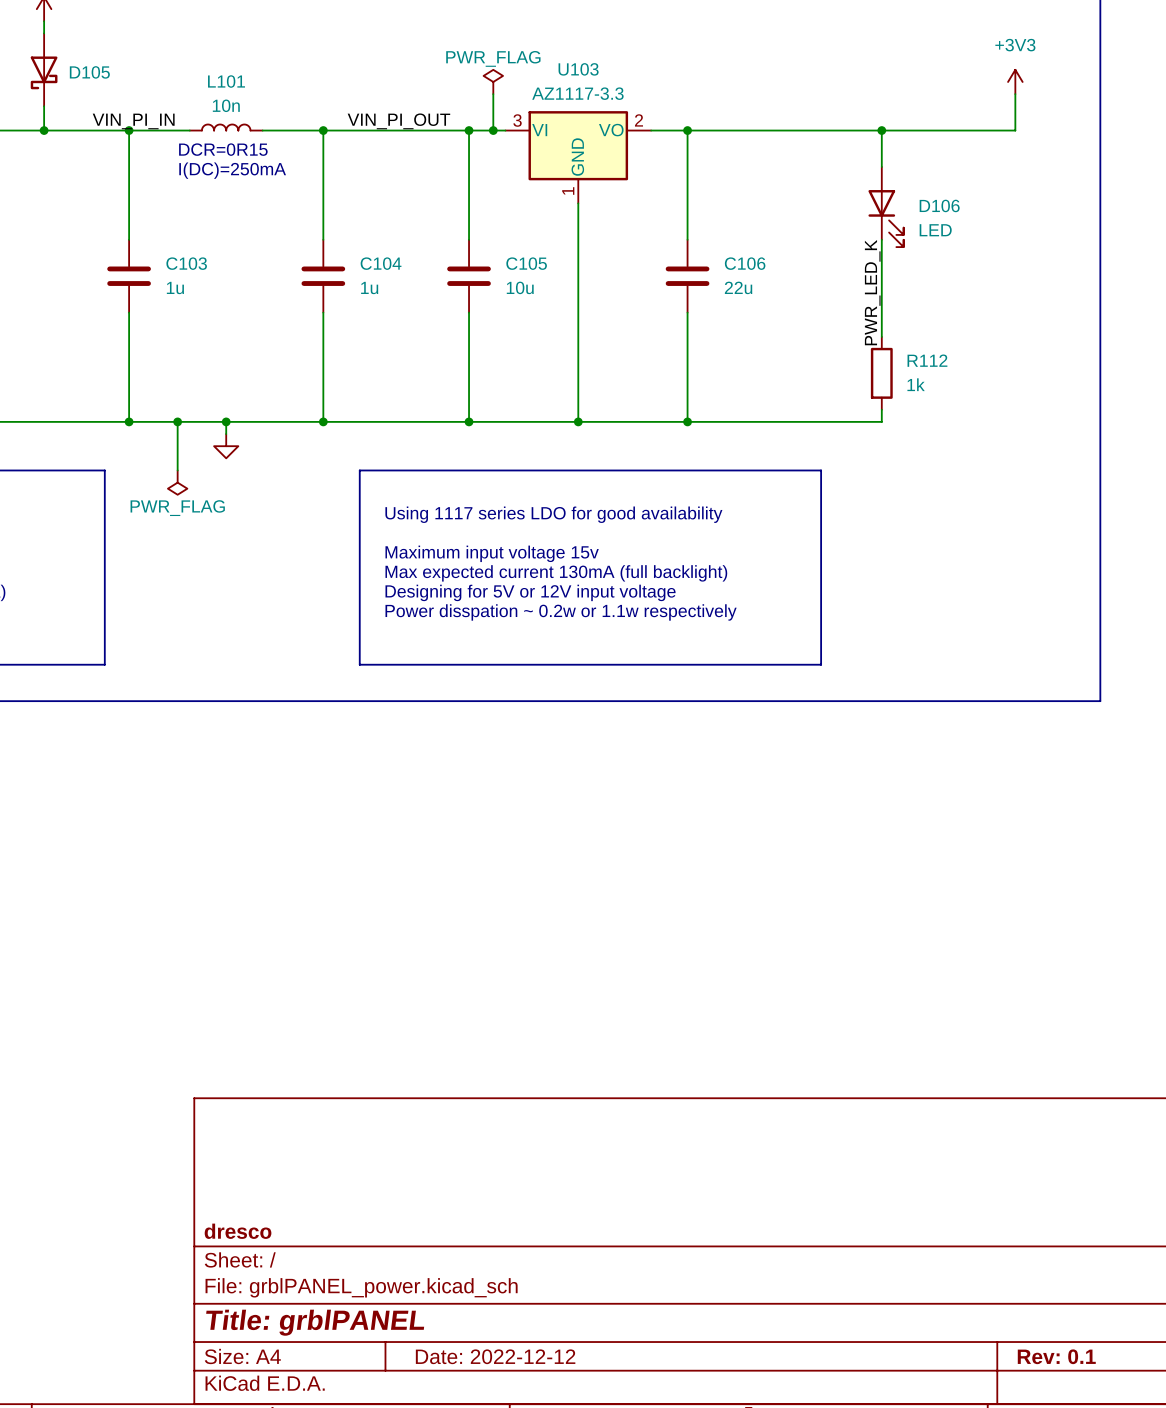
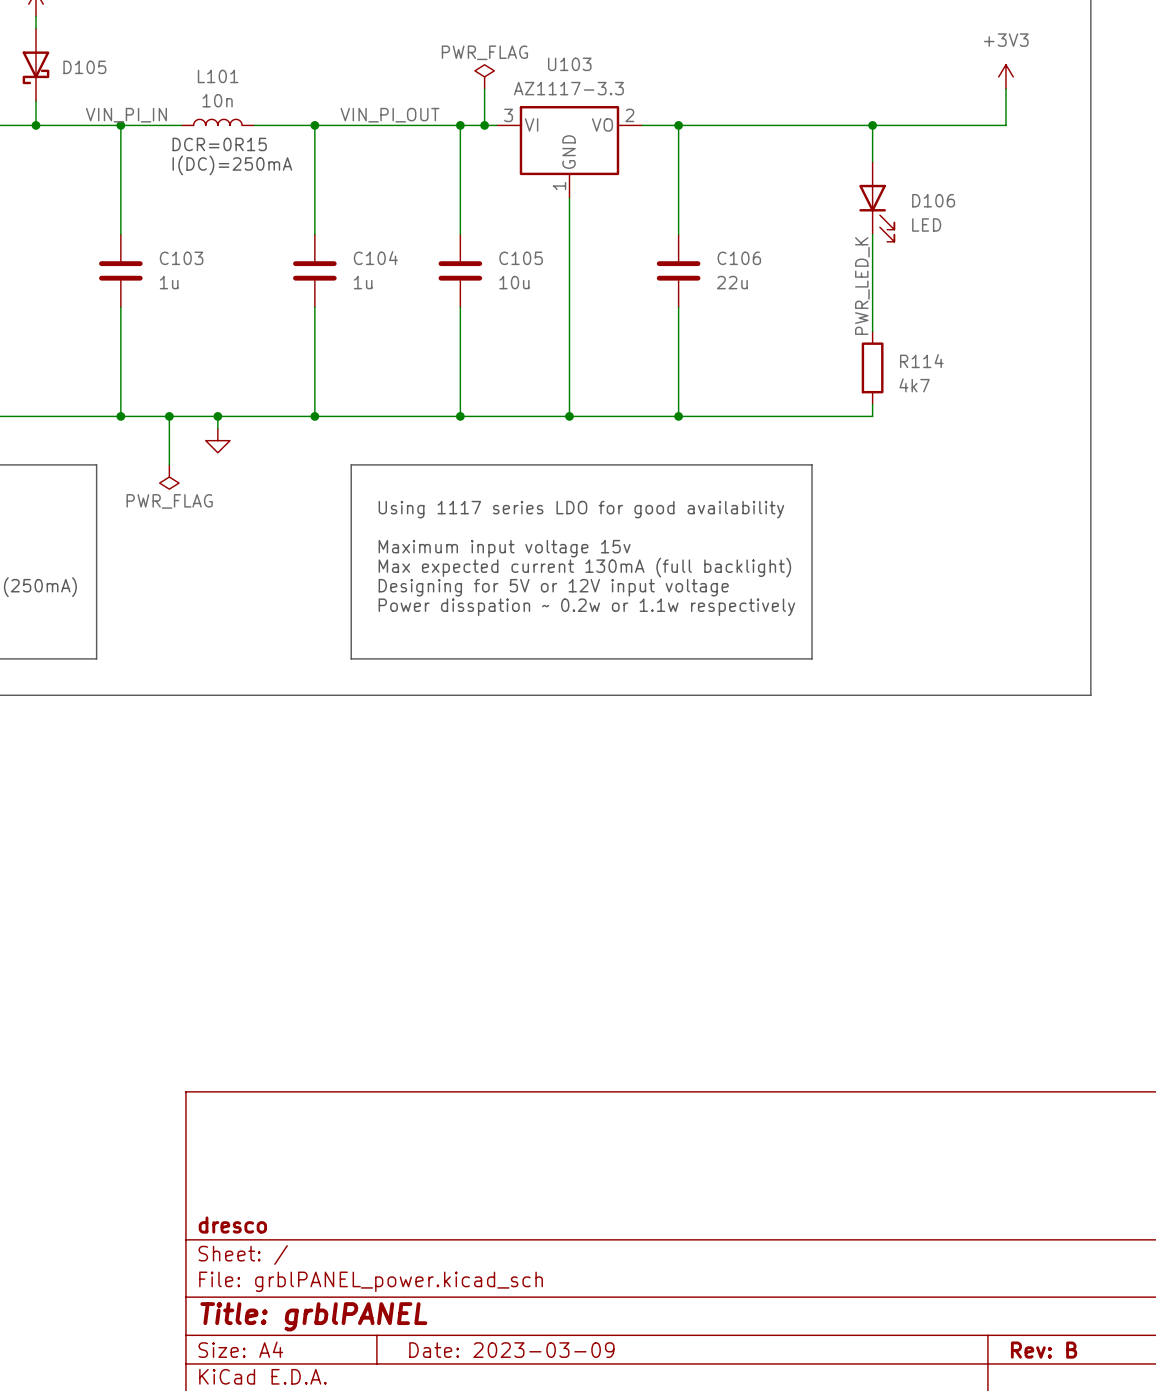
R112 name: R112 (927, 360) -> R114 (921, 361)
R112 value: 1k (916, 384) -> 4k7 (914, 385)
title block: Date: 2022-12-12 (495, 1356) -> Date: 2023-03-09 (511, 1350)
title block: Rev: 0.1 (1056, 1356) -> Rev: B (1044, 1350)

